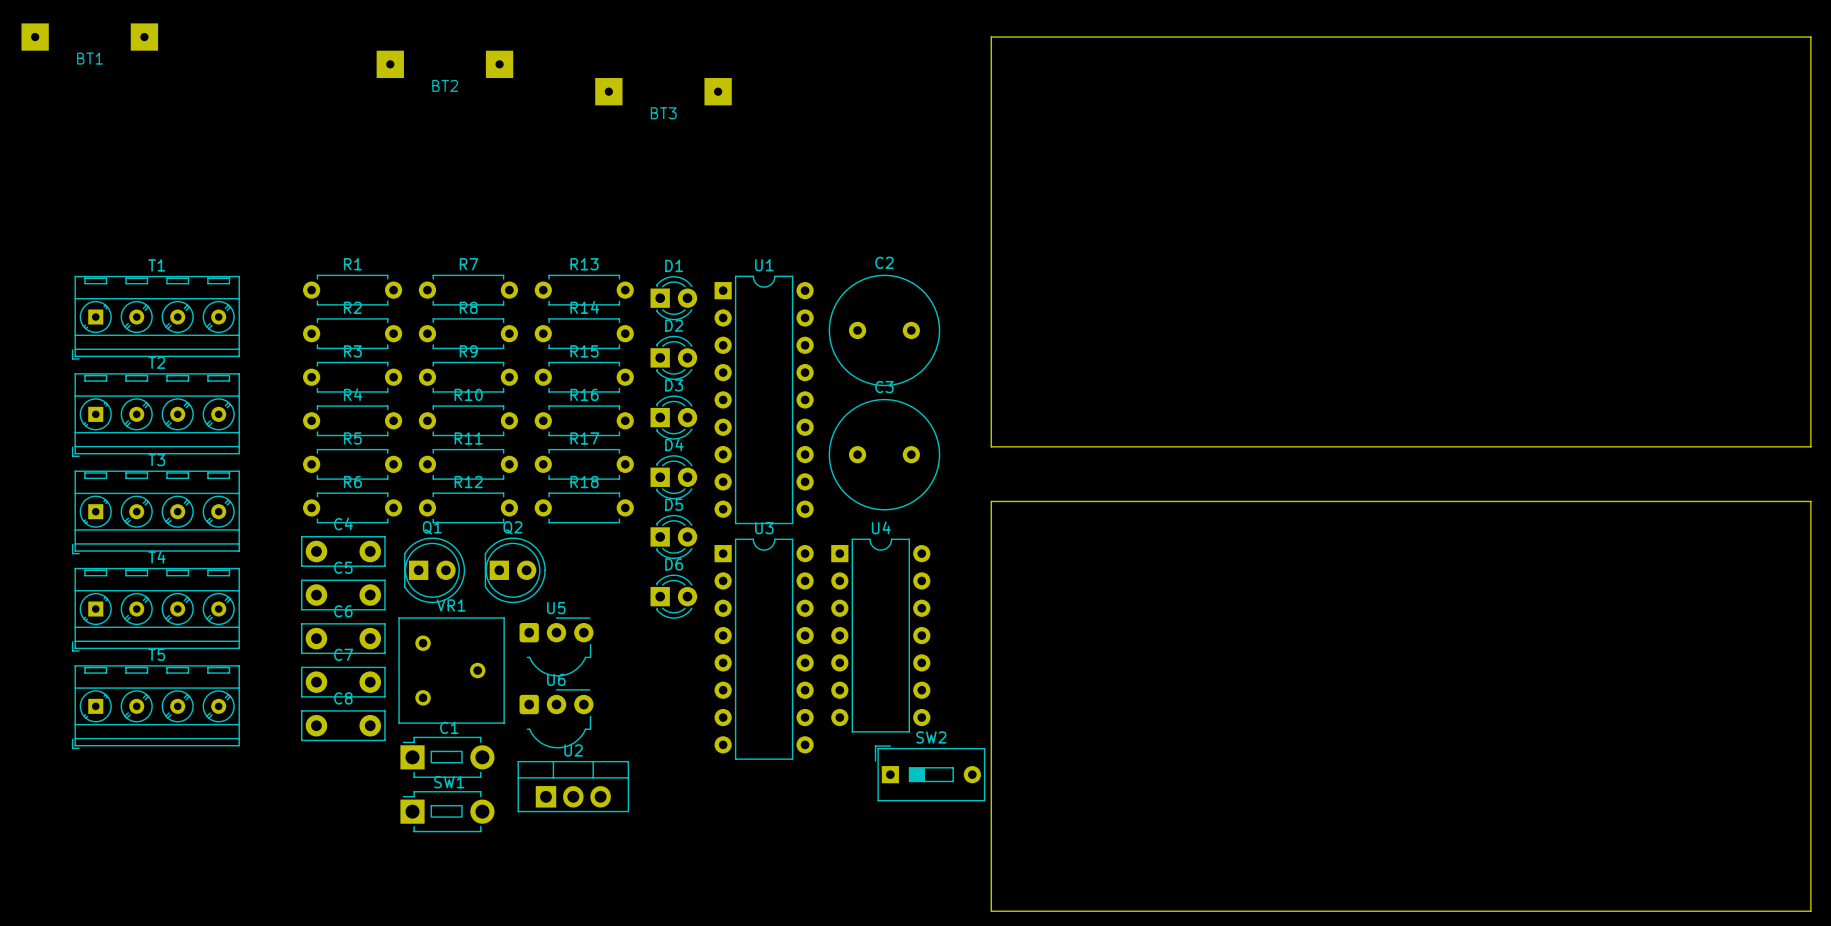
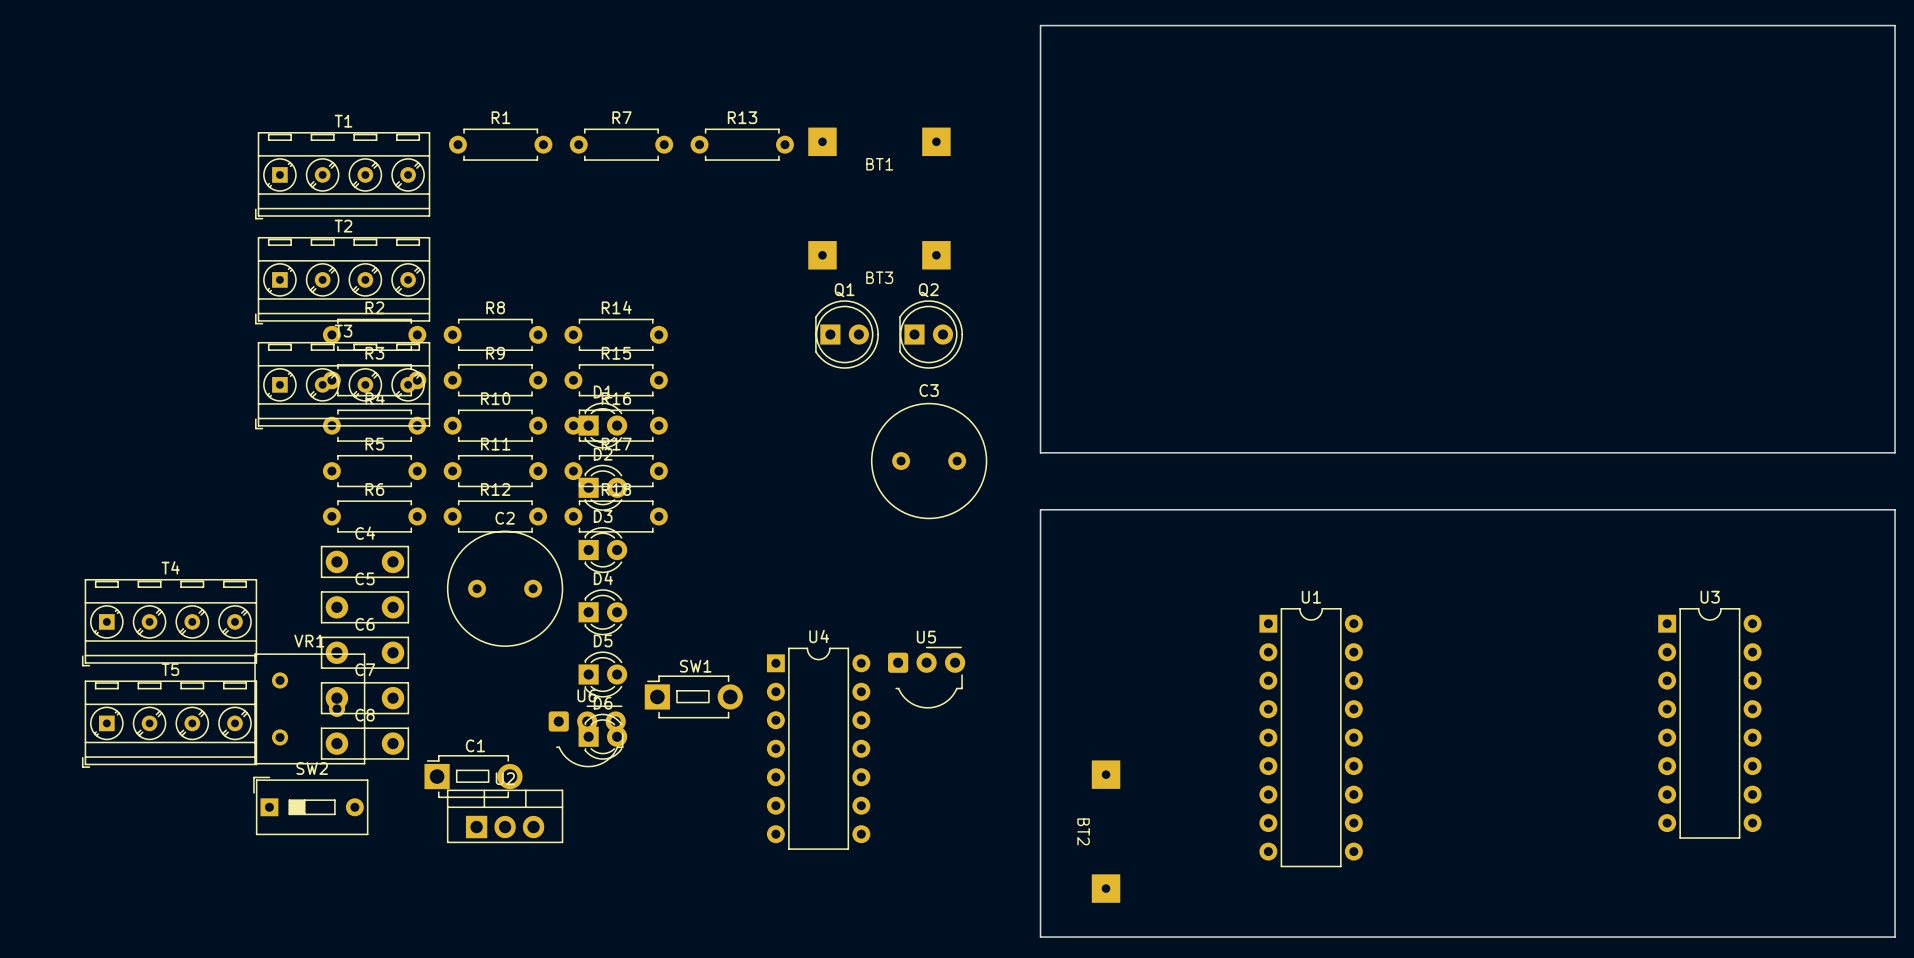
BT1 position: (89, 37) -> (879, 141)
BT2 rotation: 0° (444, 64) -> 90° clockwise (1106, 831)
BT2 position: (444, 64) -> (1106, 831)
BT3 position: (663, 91) -> (879, 255)
R1 position: (352, 290) -> (500, 144)
R7 position: (468, 290) -> (621, 144)
R13 position: (584, 290) -> (742, 144)
D1 position: (673, 298) -> (602, 425)
T1 position: (155, 317) -> (342, 175)
C2 position: (884, 330) -> (505, 588)
D2 position: (673, 357) -> (602, 487)
U1 position: (764, 399) -> (1311, 737)
T2 position: (155, 415) -> (342, 280)
D3 position: (673, 417) -> (602, 550)
D4 position: (673, 477) -> (602, 612)
T3 position: (155, 512) -> (342, 385)
D5 position: (673, 536) -> (602, 674)
Q1 position: (434, 570) -> (847, 334)
Q2 position: (515, 570) -> (931, 334)
D6 position: (673, 596) -> (602, 736)
U4 position: (880, 635) -> (818, 748)
U5 position: (556, 647) -> (926, 677)
U3 position: (764, 649) -> (1709, 723)
VR1 position: (451, 670) -> (309, 708)
SW2 position: (930, 773) -> (310, 805)
U2 position: (573, 786) -> (505, 816)
SW1 position: (447, 811) -> (693, 696)

